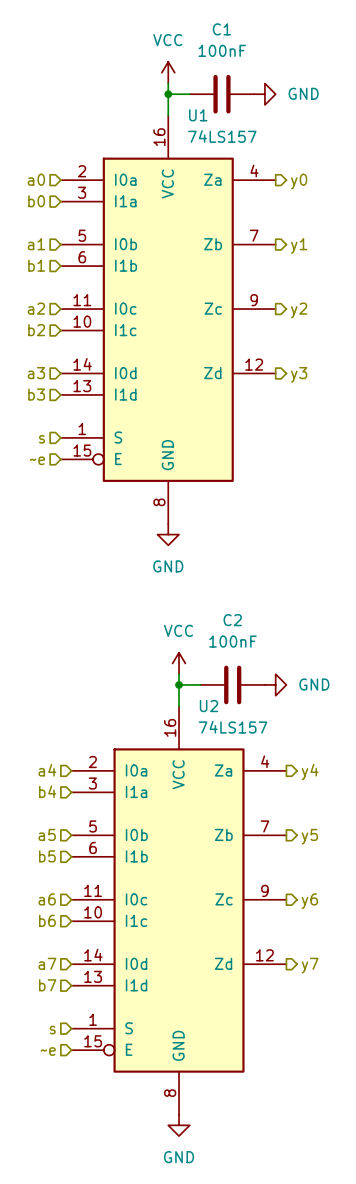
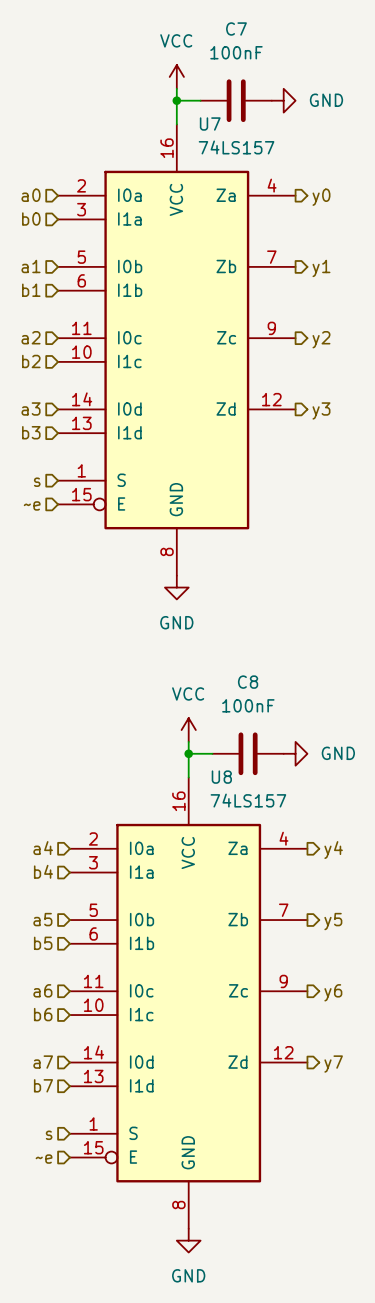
C1 name: C1 (221, 29) -> C7 (236, 29)
U1 name: U1 (198, 115) -> U7 (210, 123)
C2 name: C2 (232, 620) -> C8 (248, 682)
U2 name: U2 (208, 706) -> U8 (221, 777)

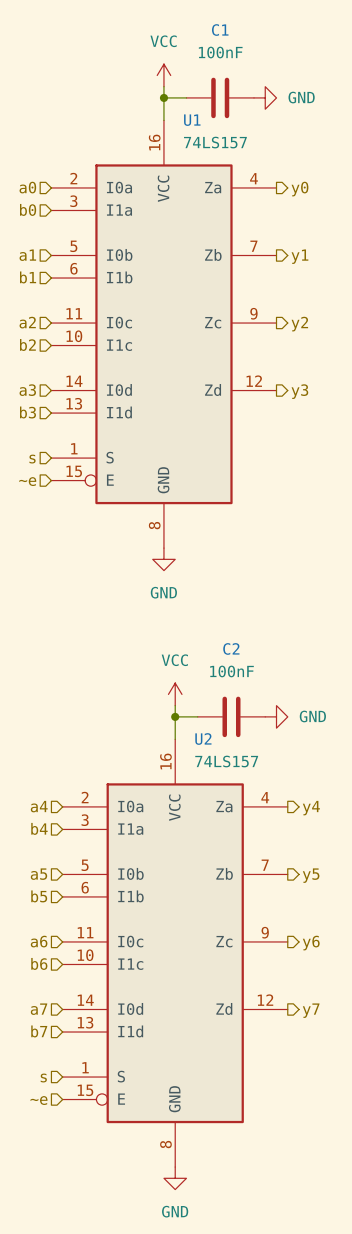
C7 name: C7 (236, 29) -> C1 (220, 30)
U7 name: U7 (210, 123) -> U1 (192, 120)
C8 name: C8 (248, 682) -> C2 (231, 648)
U8 name: U8 (221, 777) -> U2 (203, 739)

